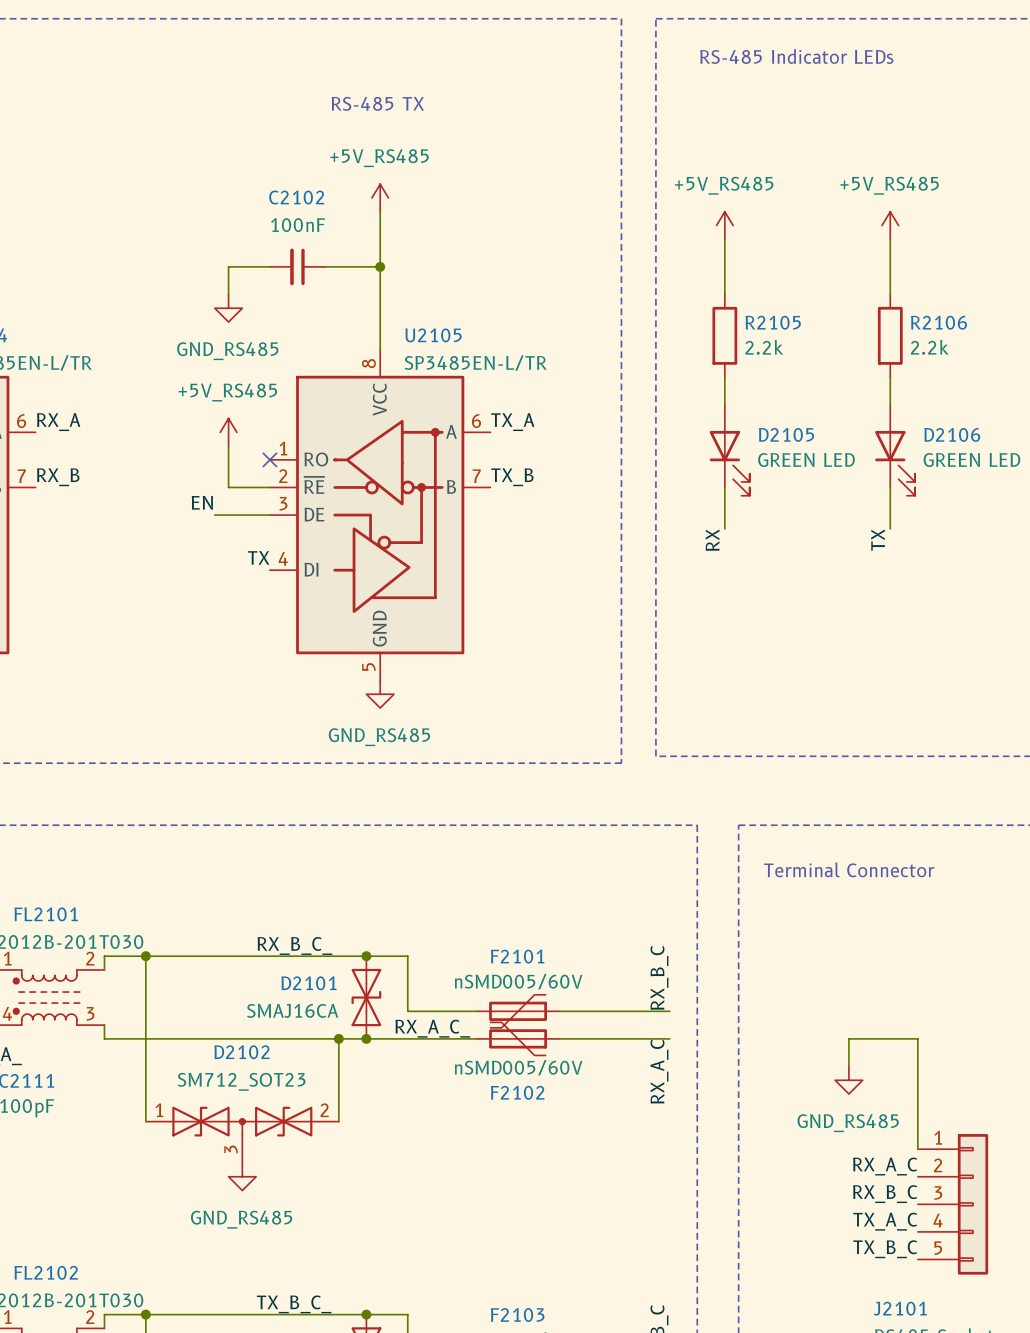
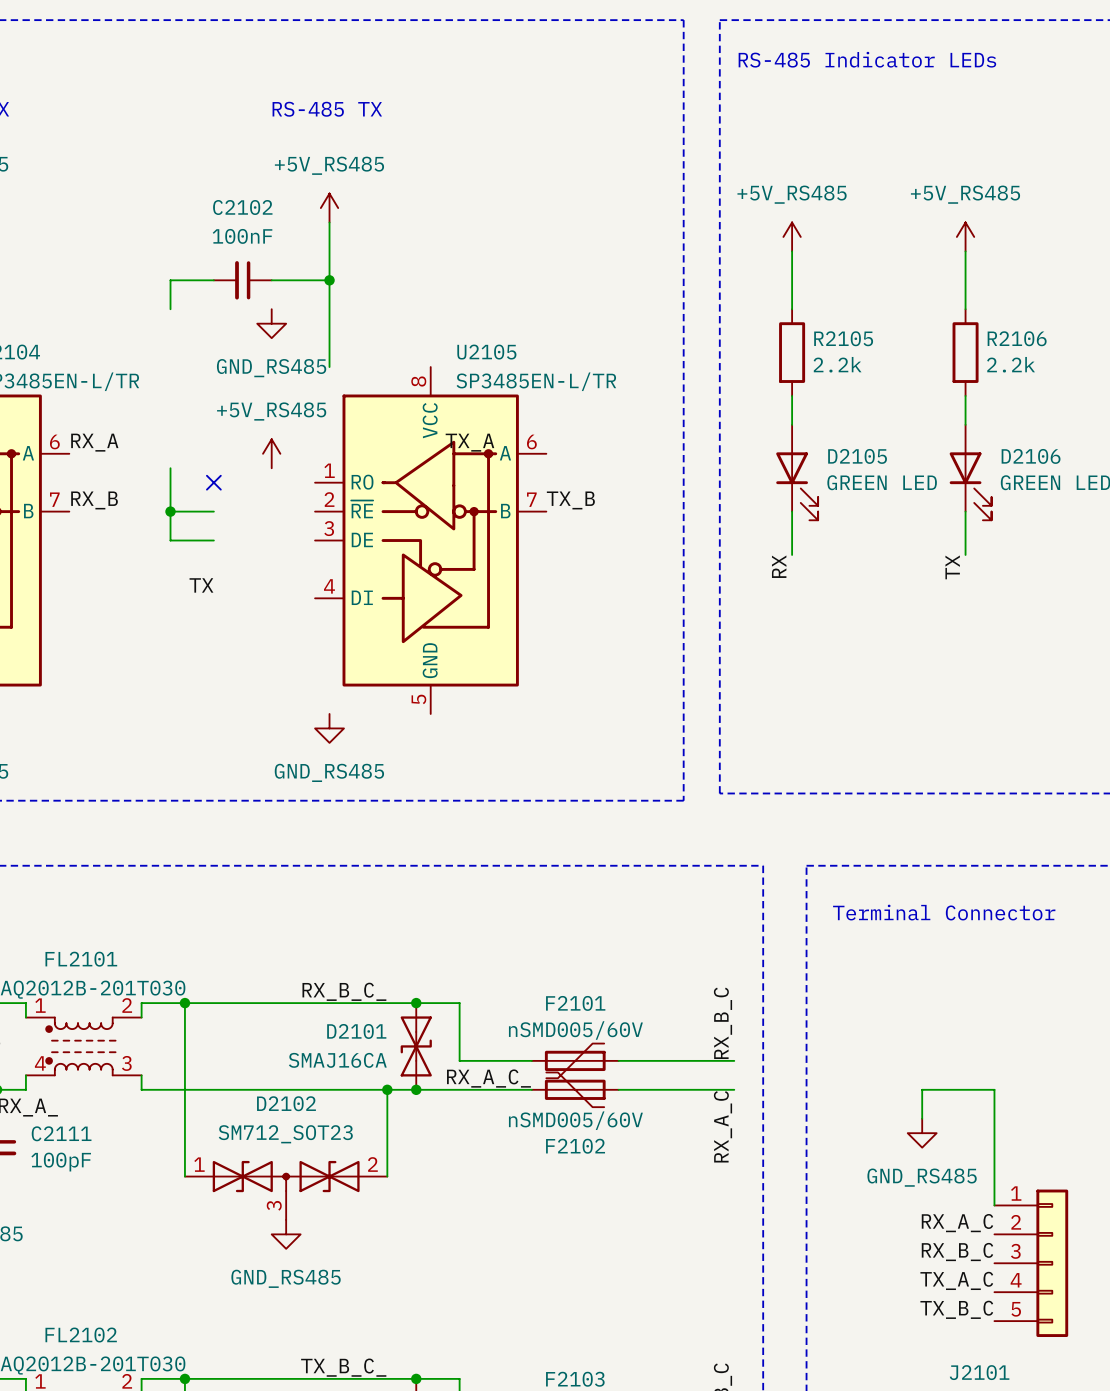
text position: RS-485 TX (377, 103) -> RS-485 TX (327, 109)
power symbol position: +5V_RS485 (380, 197) -> +5V_RS485 (329, 208)
wire: (380, 211) (380, 349) -> (329, 222) (329, 367)
wire: none -> (213, 280) (170, 280) (170, 309)
wire: (228, 266) (228, 294) -> none
junction: none -> (329, 280)
C2102 position: (297, 266) -> (242, 280)
wire: (325, 266) (380, 266) -> none
junction: (380, 266) -> none
label position: TX_A (512, 422) -> TX_A (469, 442)
wire: none -> (170, 468) (170, 540) (213, 540)
wire: (228, 446) (228, 487) (269, 487) -> none
no-connect mark: none -> (213, 482)
no-connect mark: (269, 459) -> none
wire: none -> (170, 511) (213, 511)
junction: none -> (170, 511)
label: EN (202, 502) -> none
wire: (214, 515) (269, 515) -> none
label position: TX (258, 557) -> TX (201, 585)
power symbol position: GND_RS485 (380, 694) -> GND_RS485 (329, 728)

